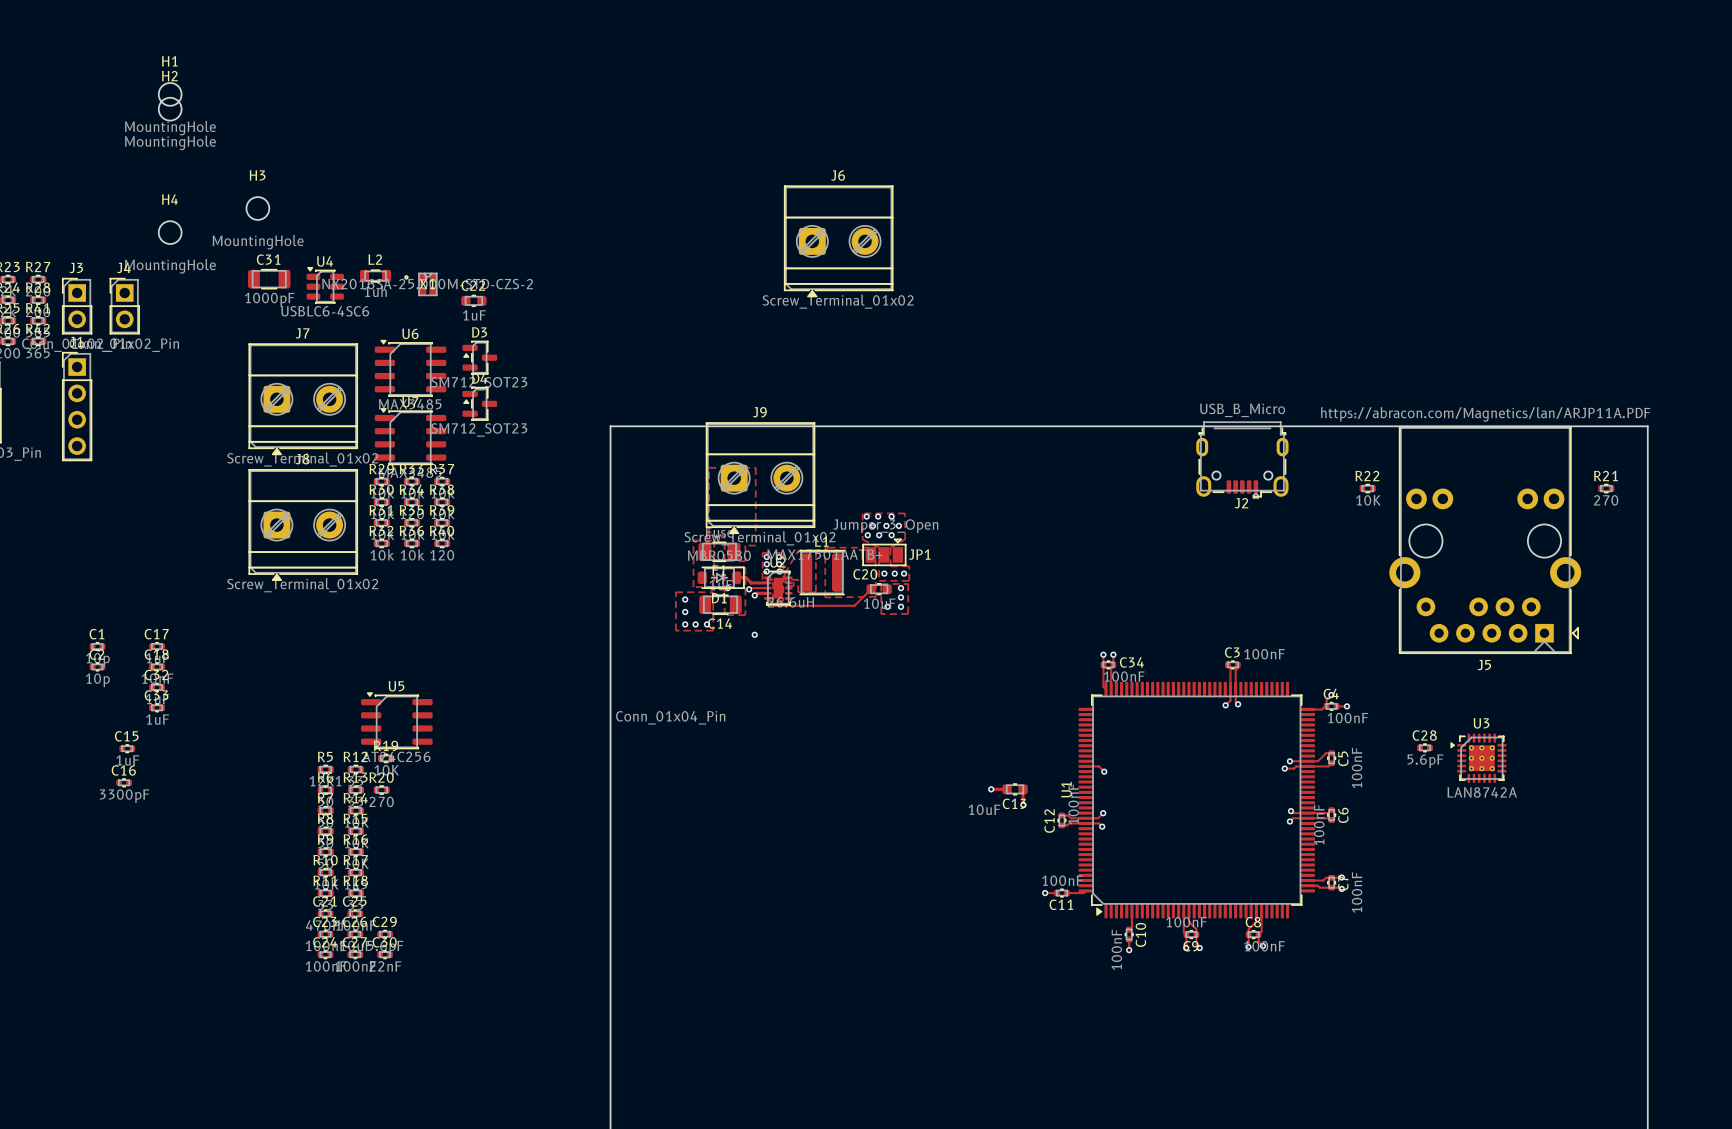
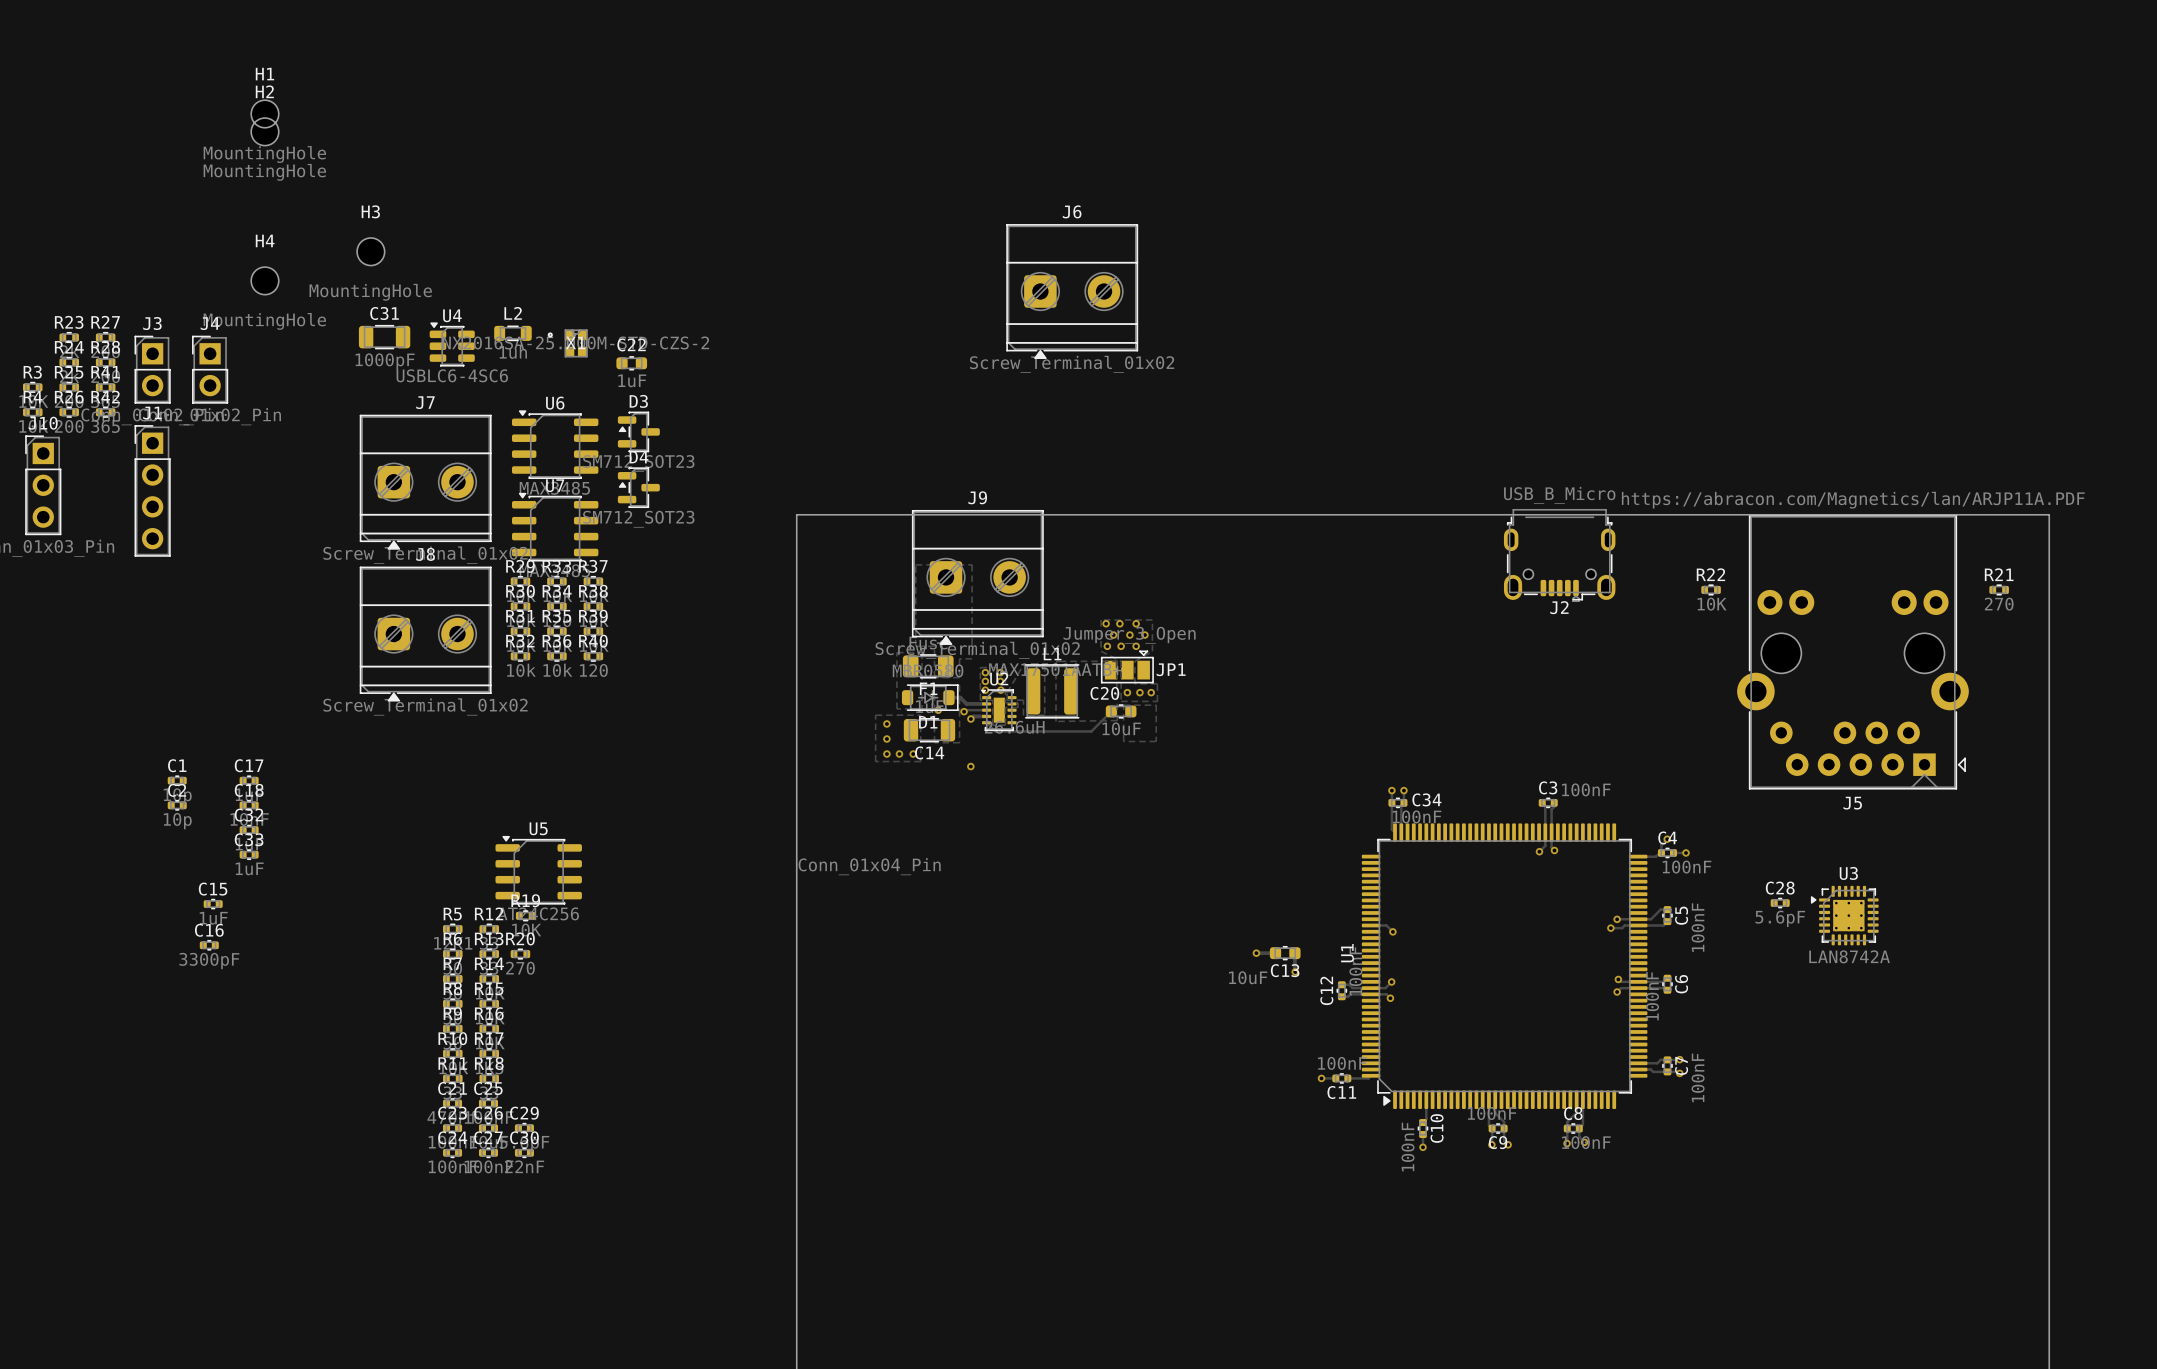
via: (900, 588) -> none
via: (900, 597) -> none
via: (887, 606) -> none
via: (900, 606) -> none

